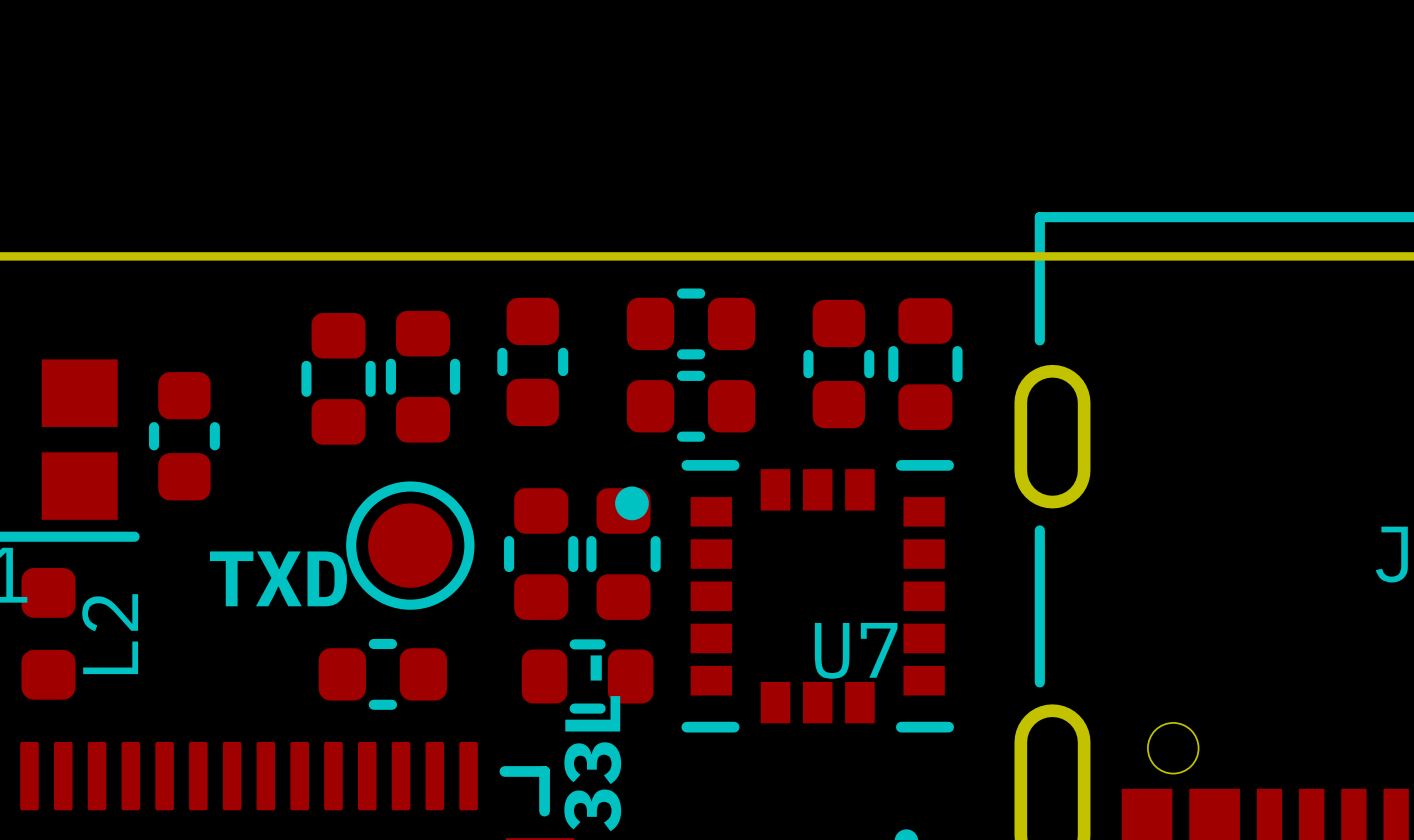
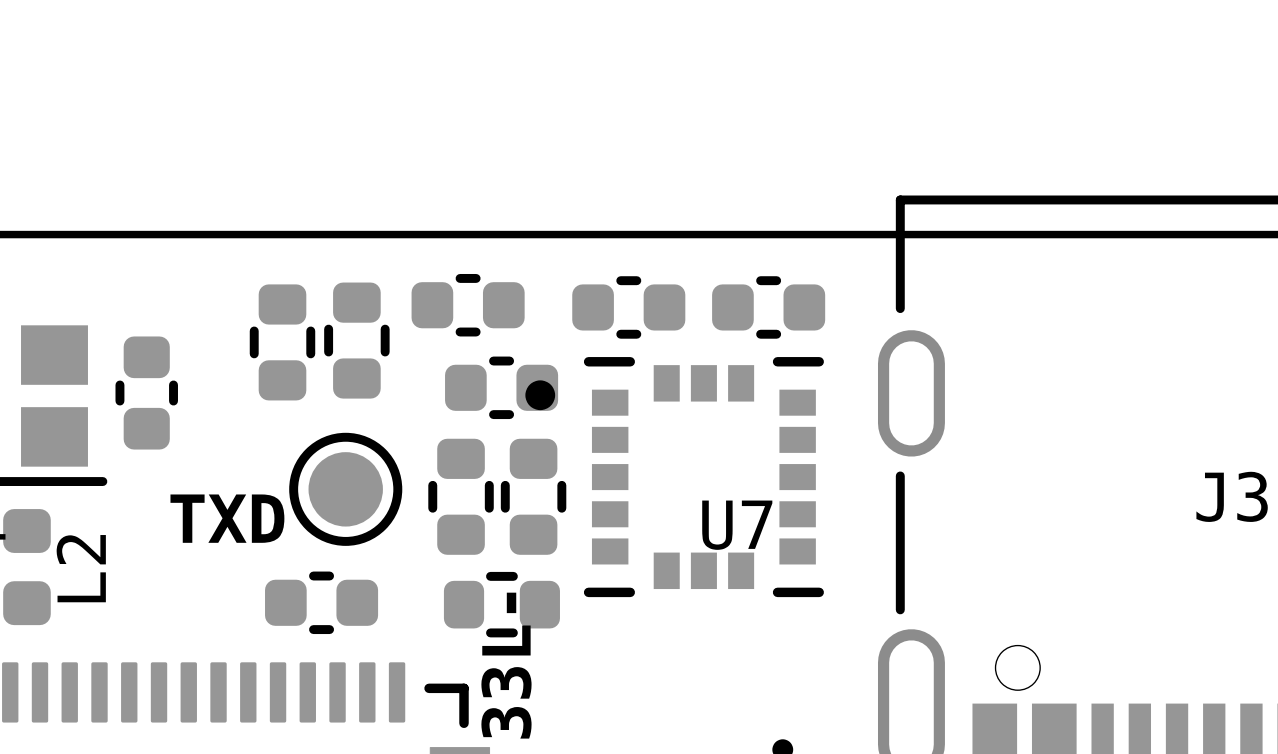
part: (691, 323) -> none
part: none -> (628, 307)
part: none -> (768, 307)
part rotation: 0° (532, 361) -> 90° clockwise (468, 305)
part: (838, 364) -> none
part: (925, 364) -> none
part: (691, 406) -> none
part: none -> (501, 387)
U7 position: (784, 596) -> (674, 477)

